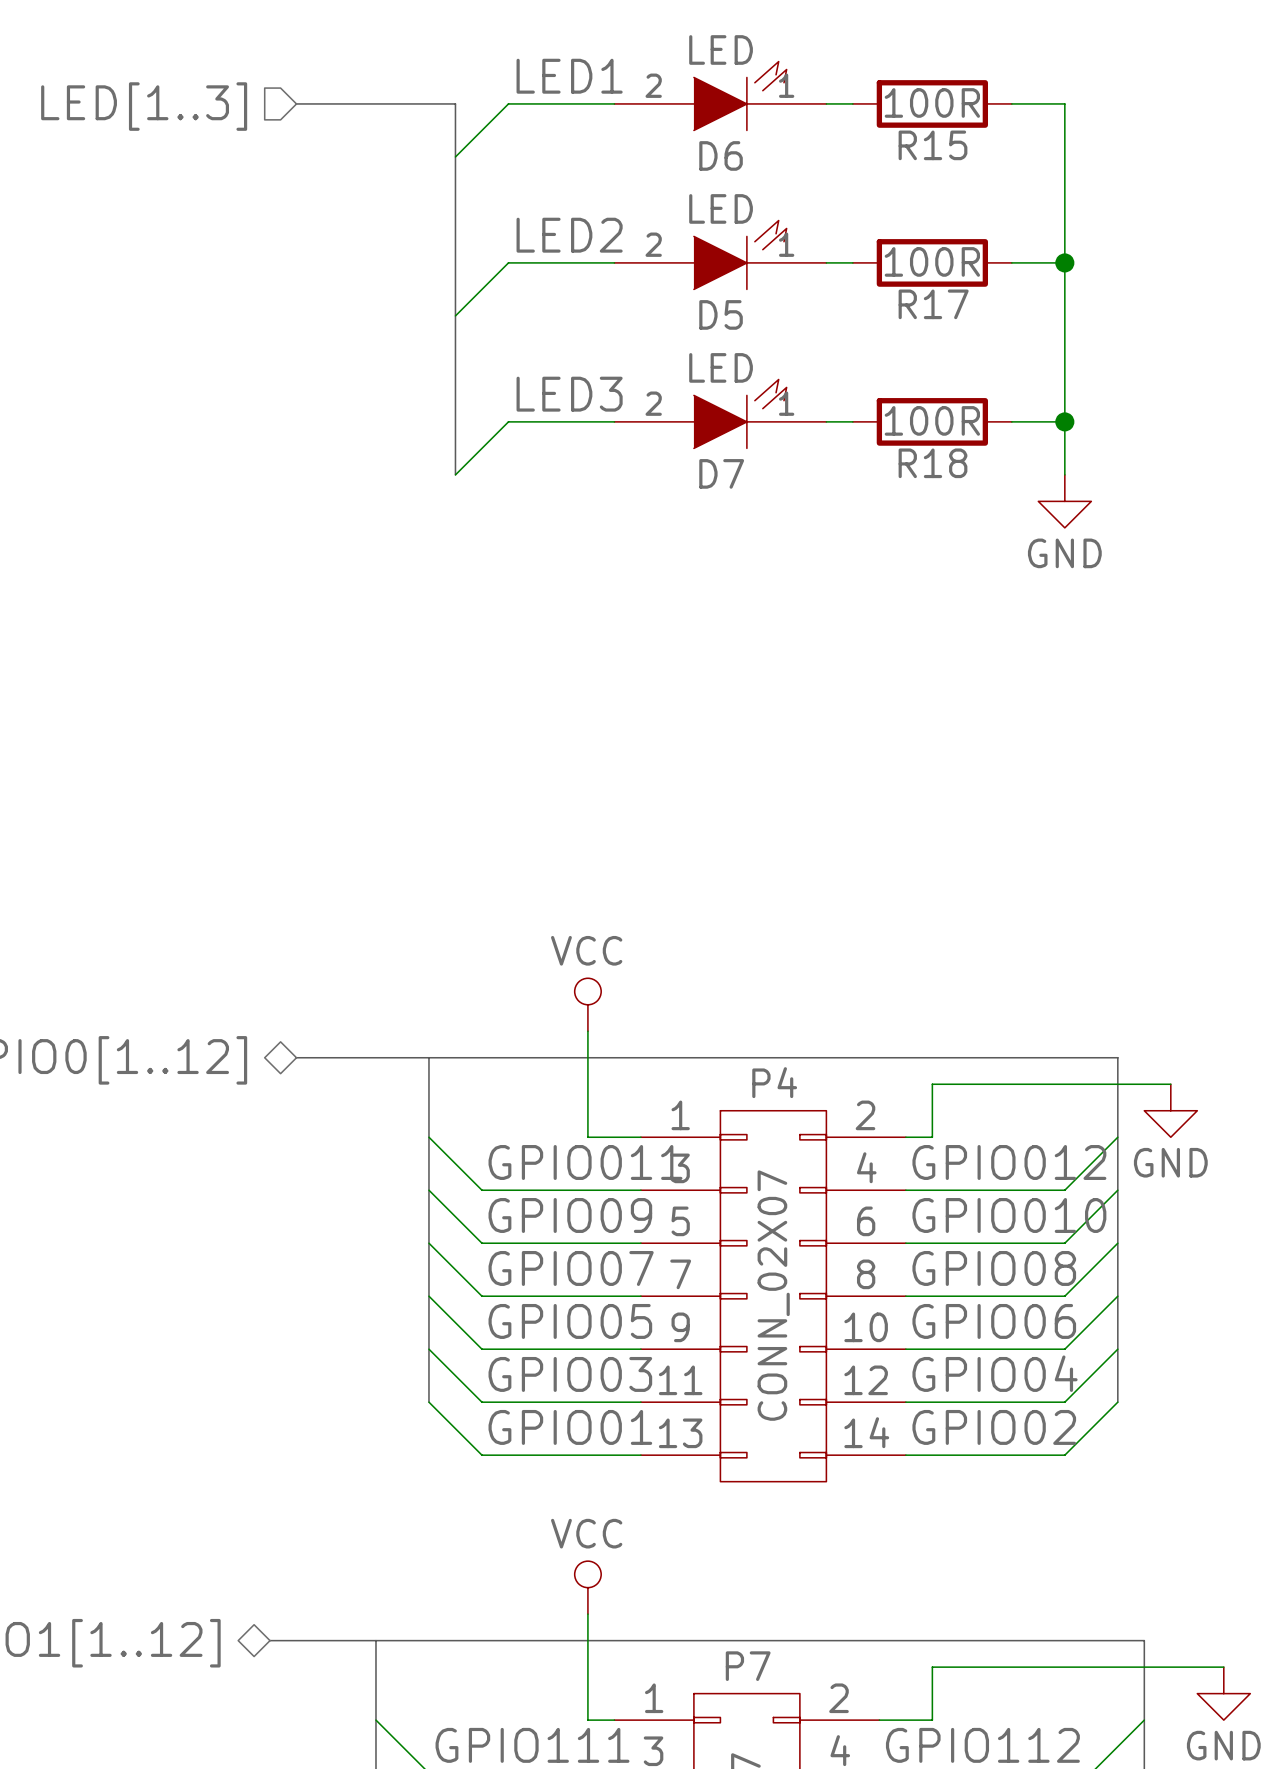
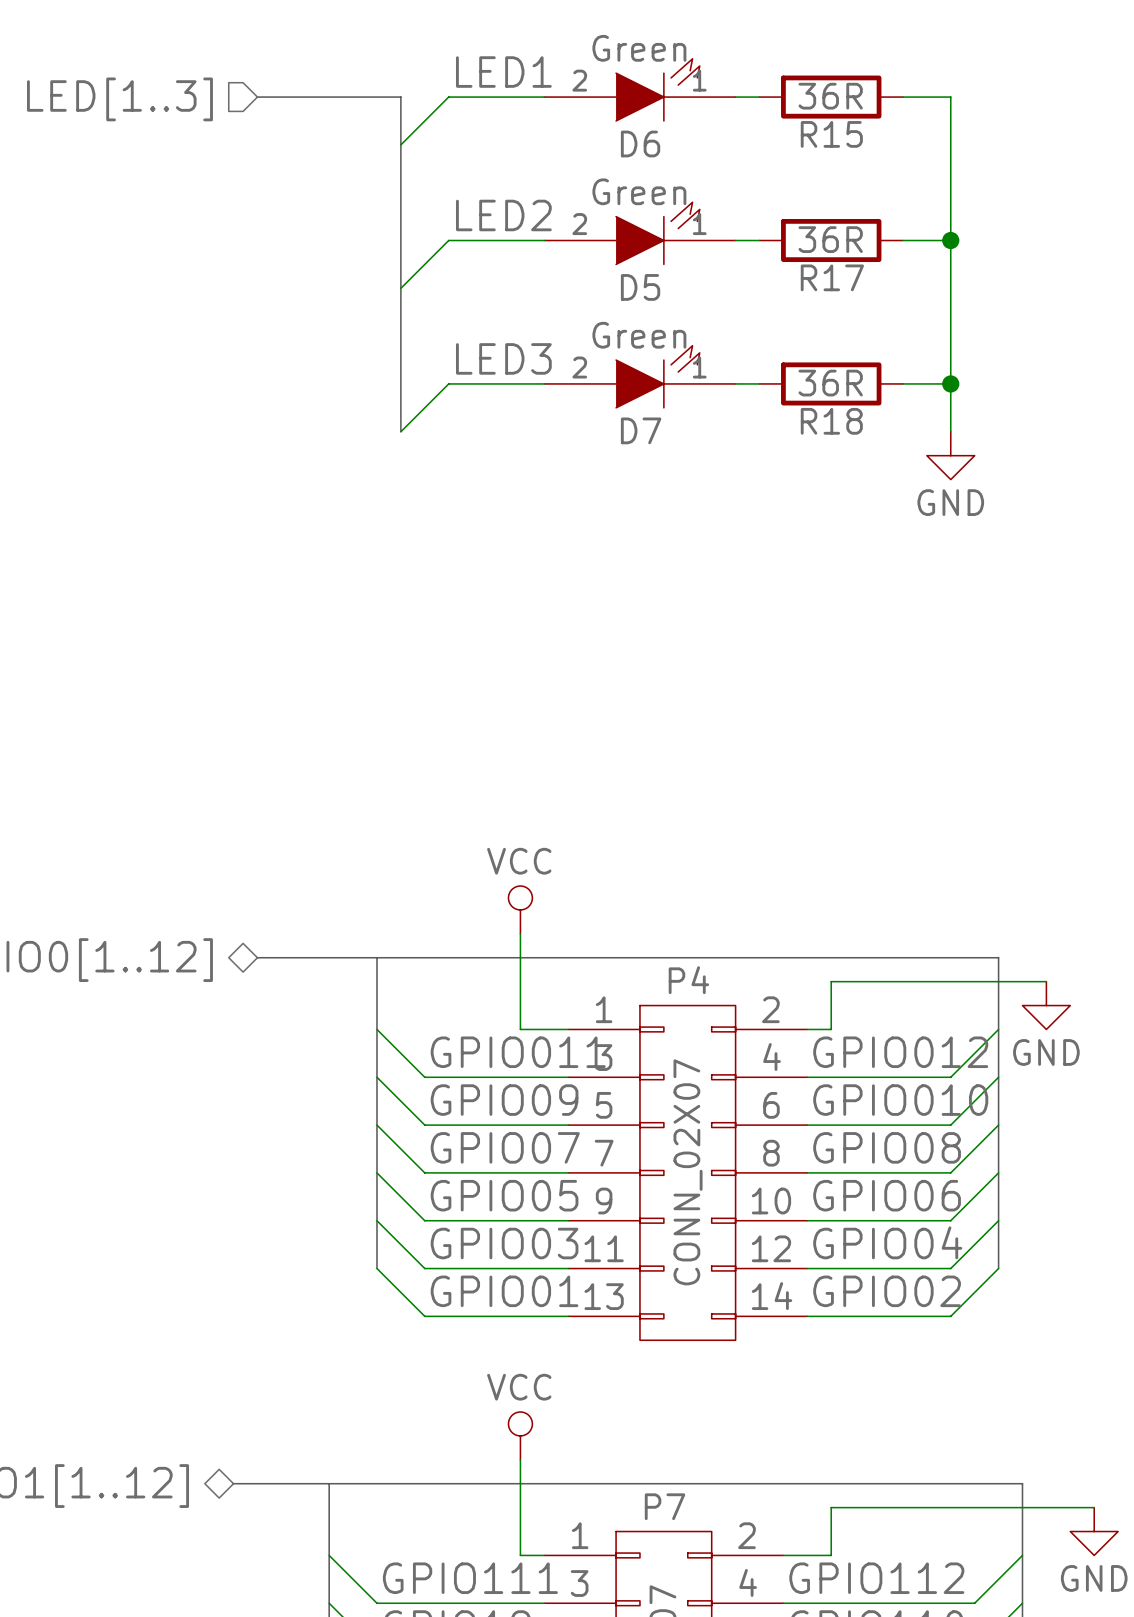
D6 value: LED (721, 49) -> Green (639, 48)
R15 value: 100R (932, 102) -> 36R (830, 96)
D5 value: LED (721, 208) -> Green (639, 191)
R17 value: 100R (932, 261) -> 36R (830, 239)
D7 value: LED (721, 367) -> Green (639, 335)
R18 value: 100R (932, 420) -> 36R (830, 383)

